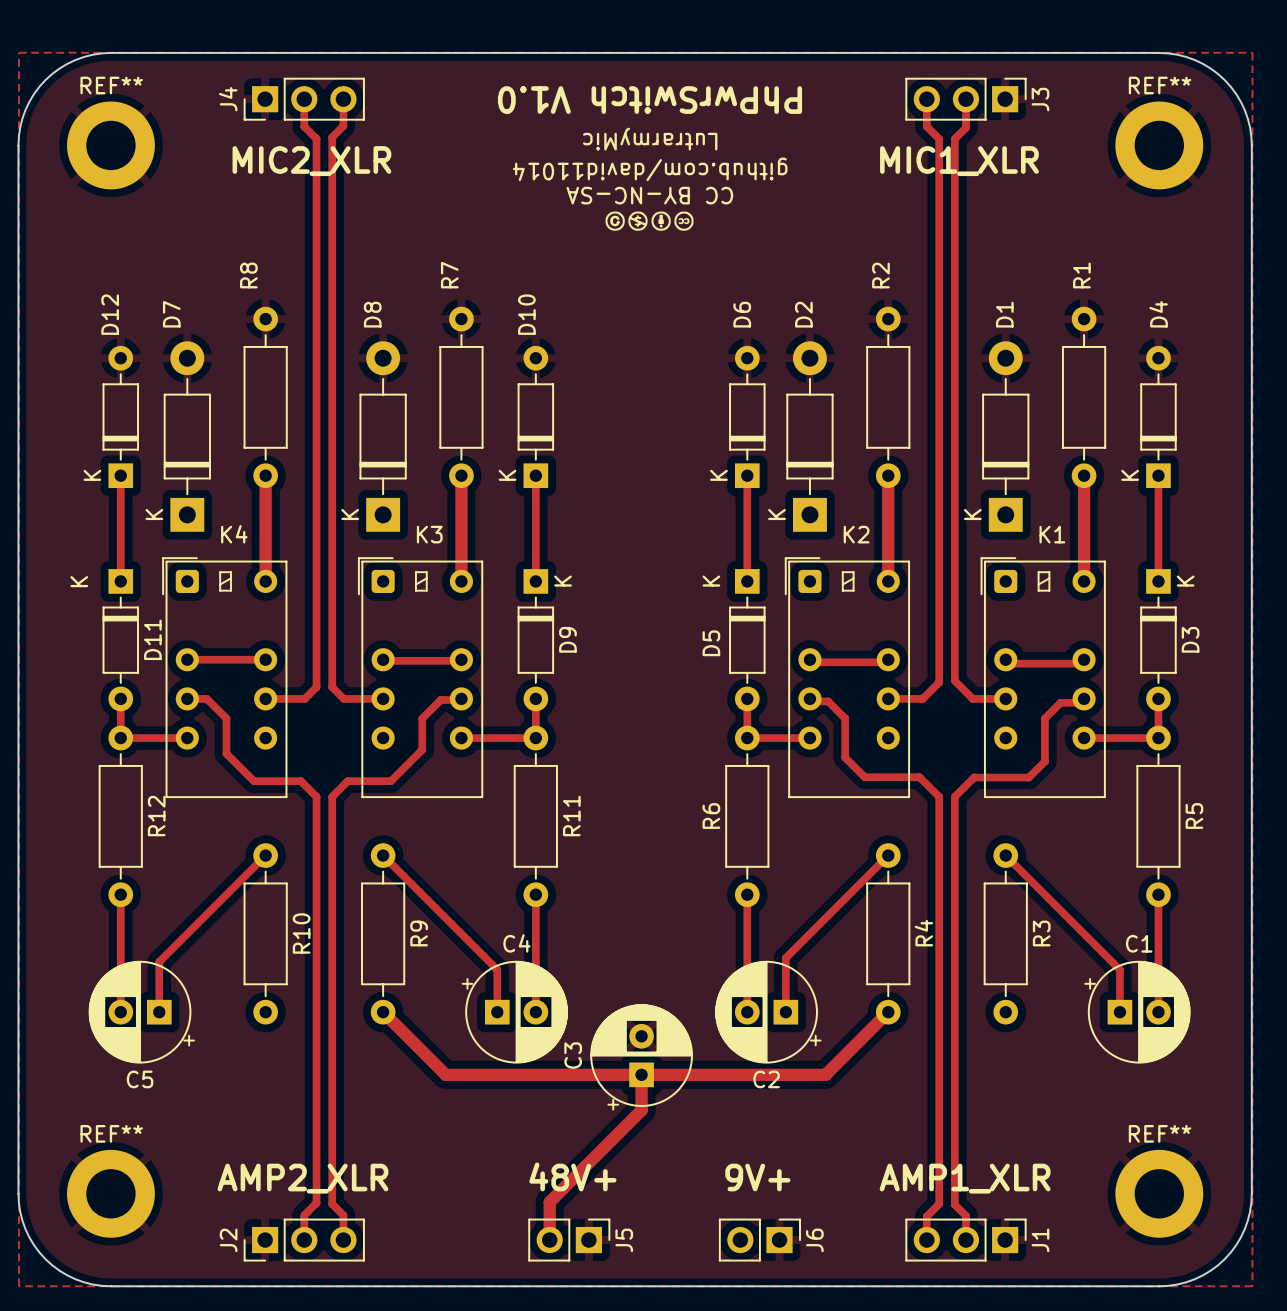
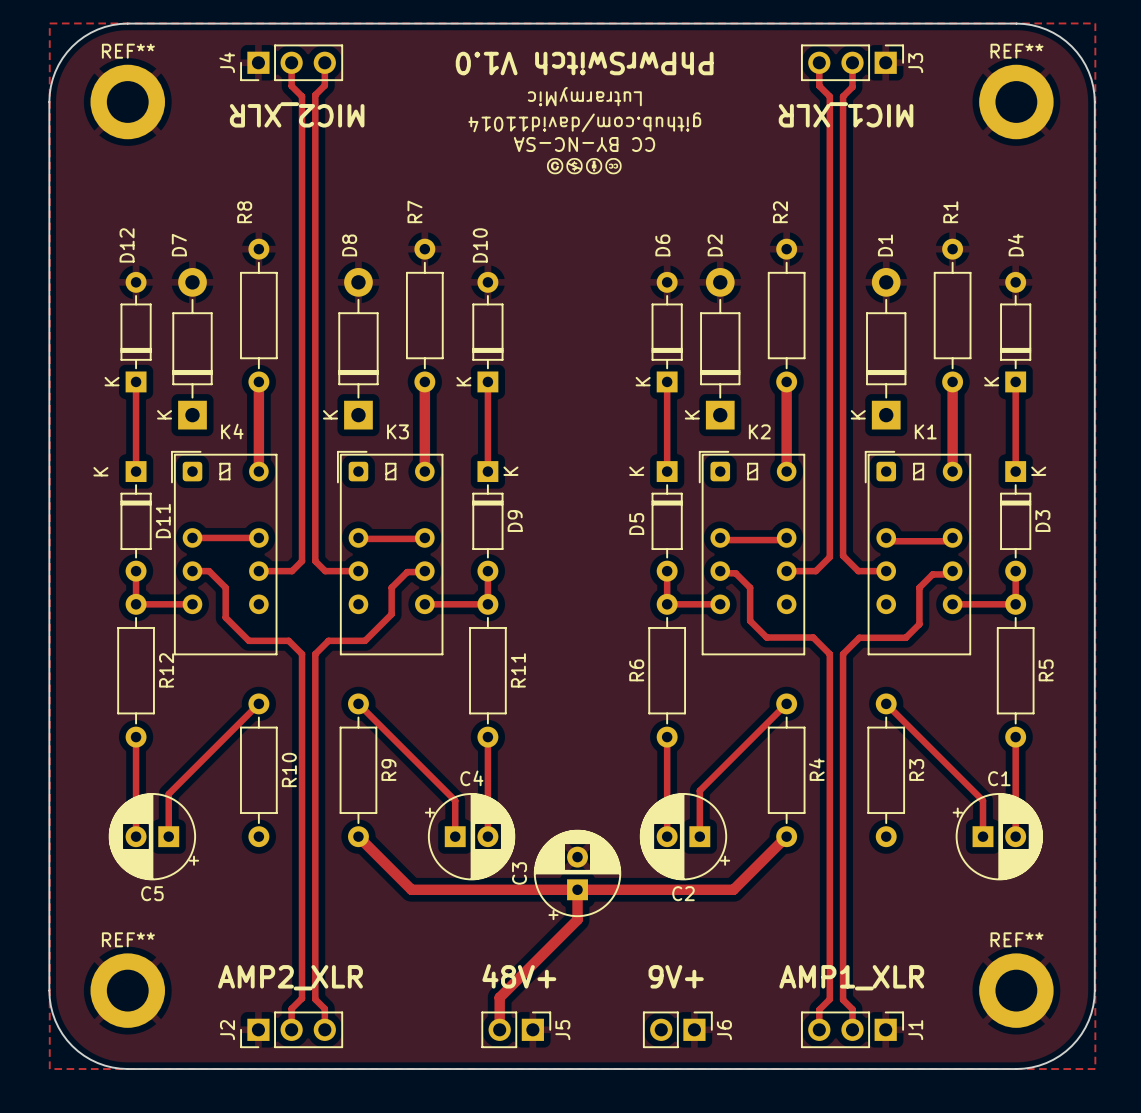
text rotation: 0° (311, 161) -> 180° (297, 114)
text rotation: 0° (959, 161) -> 180° (846, 114)

